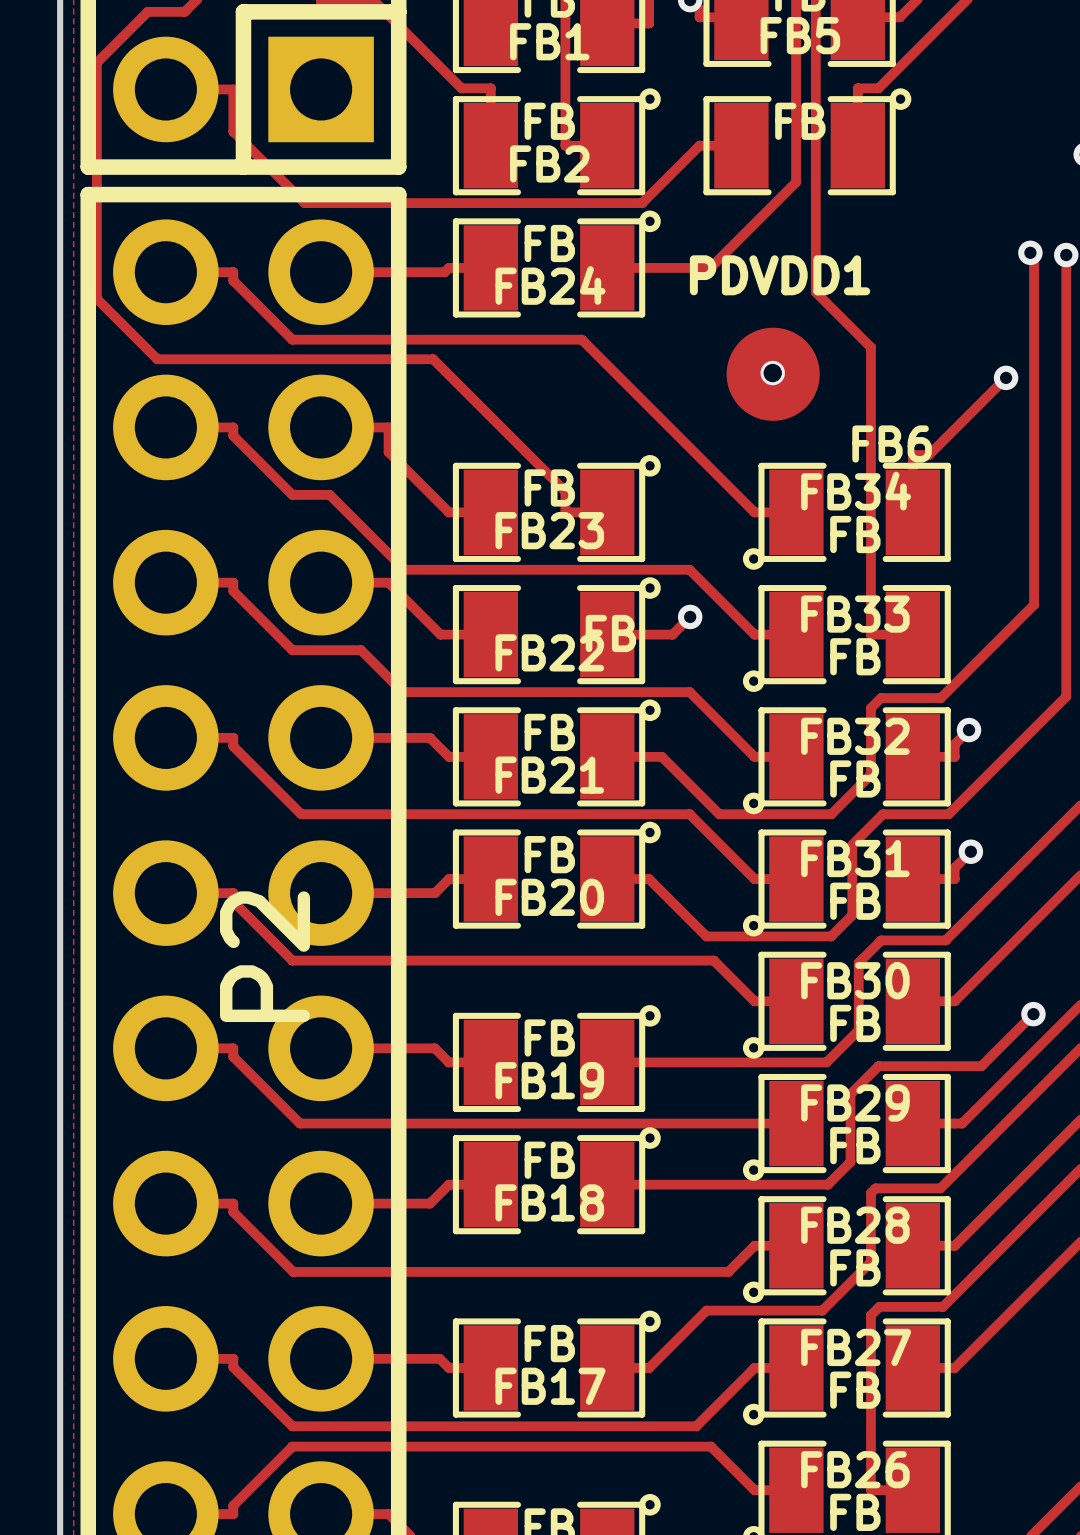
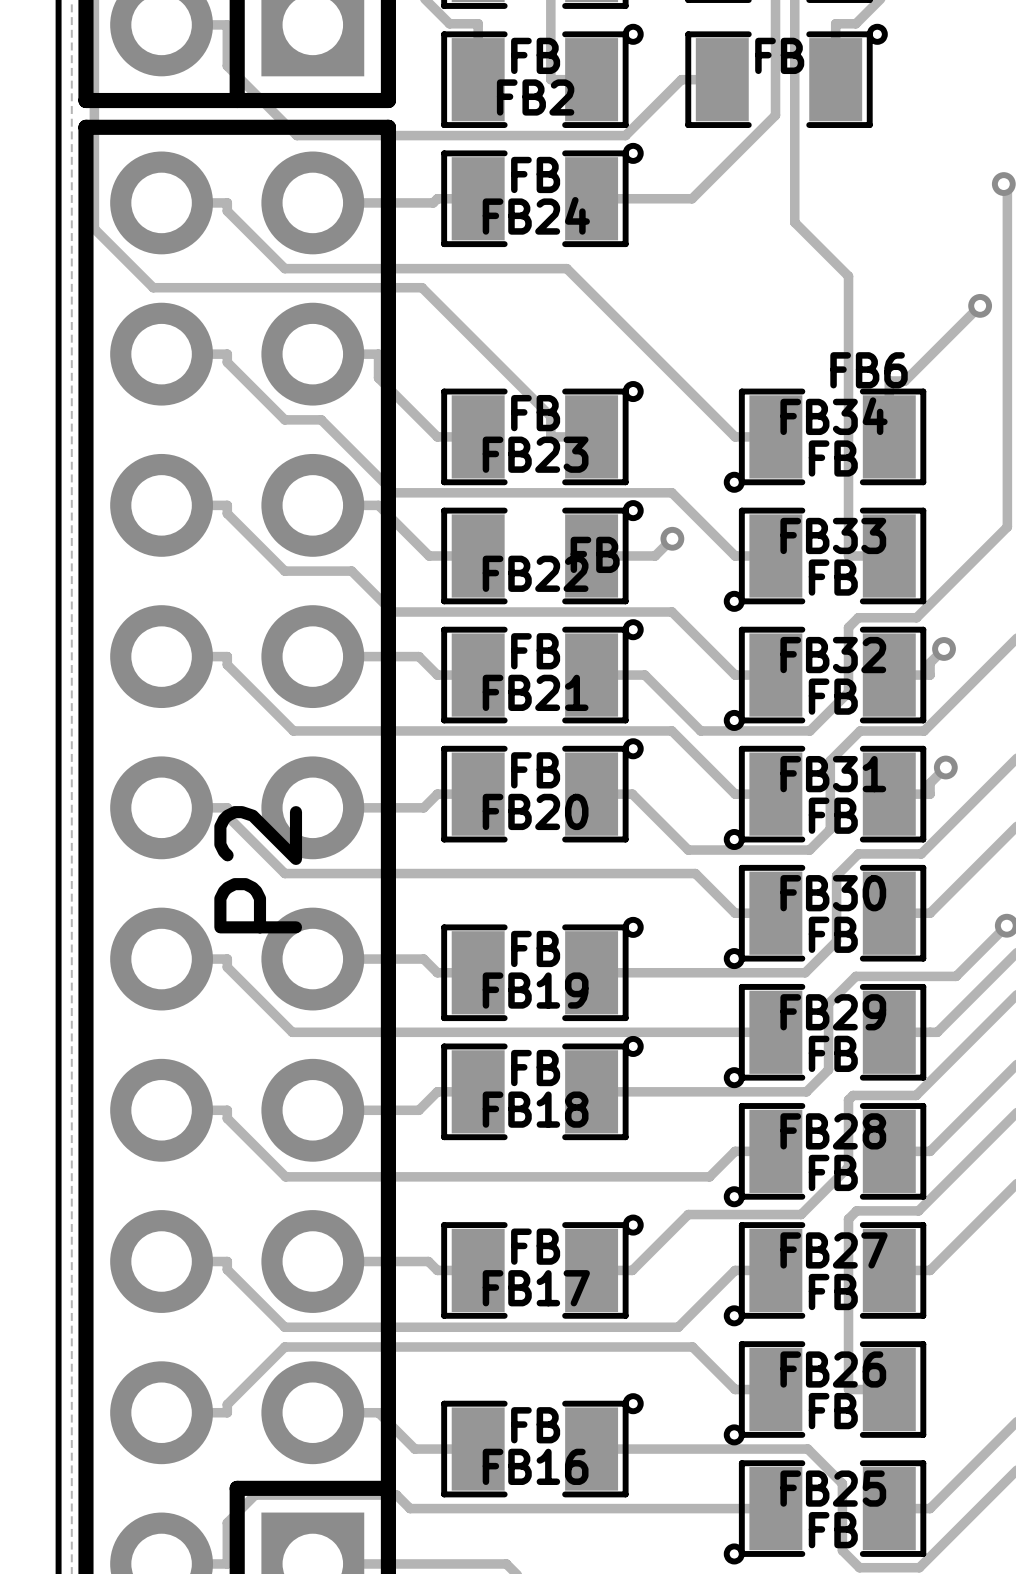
via: (772, 373) -> none
PDVDD1: (773, 374) -> none

